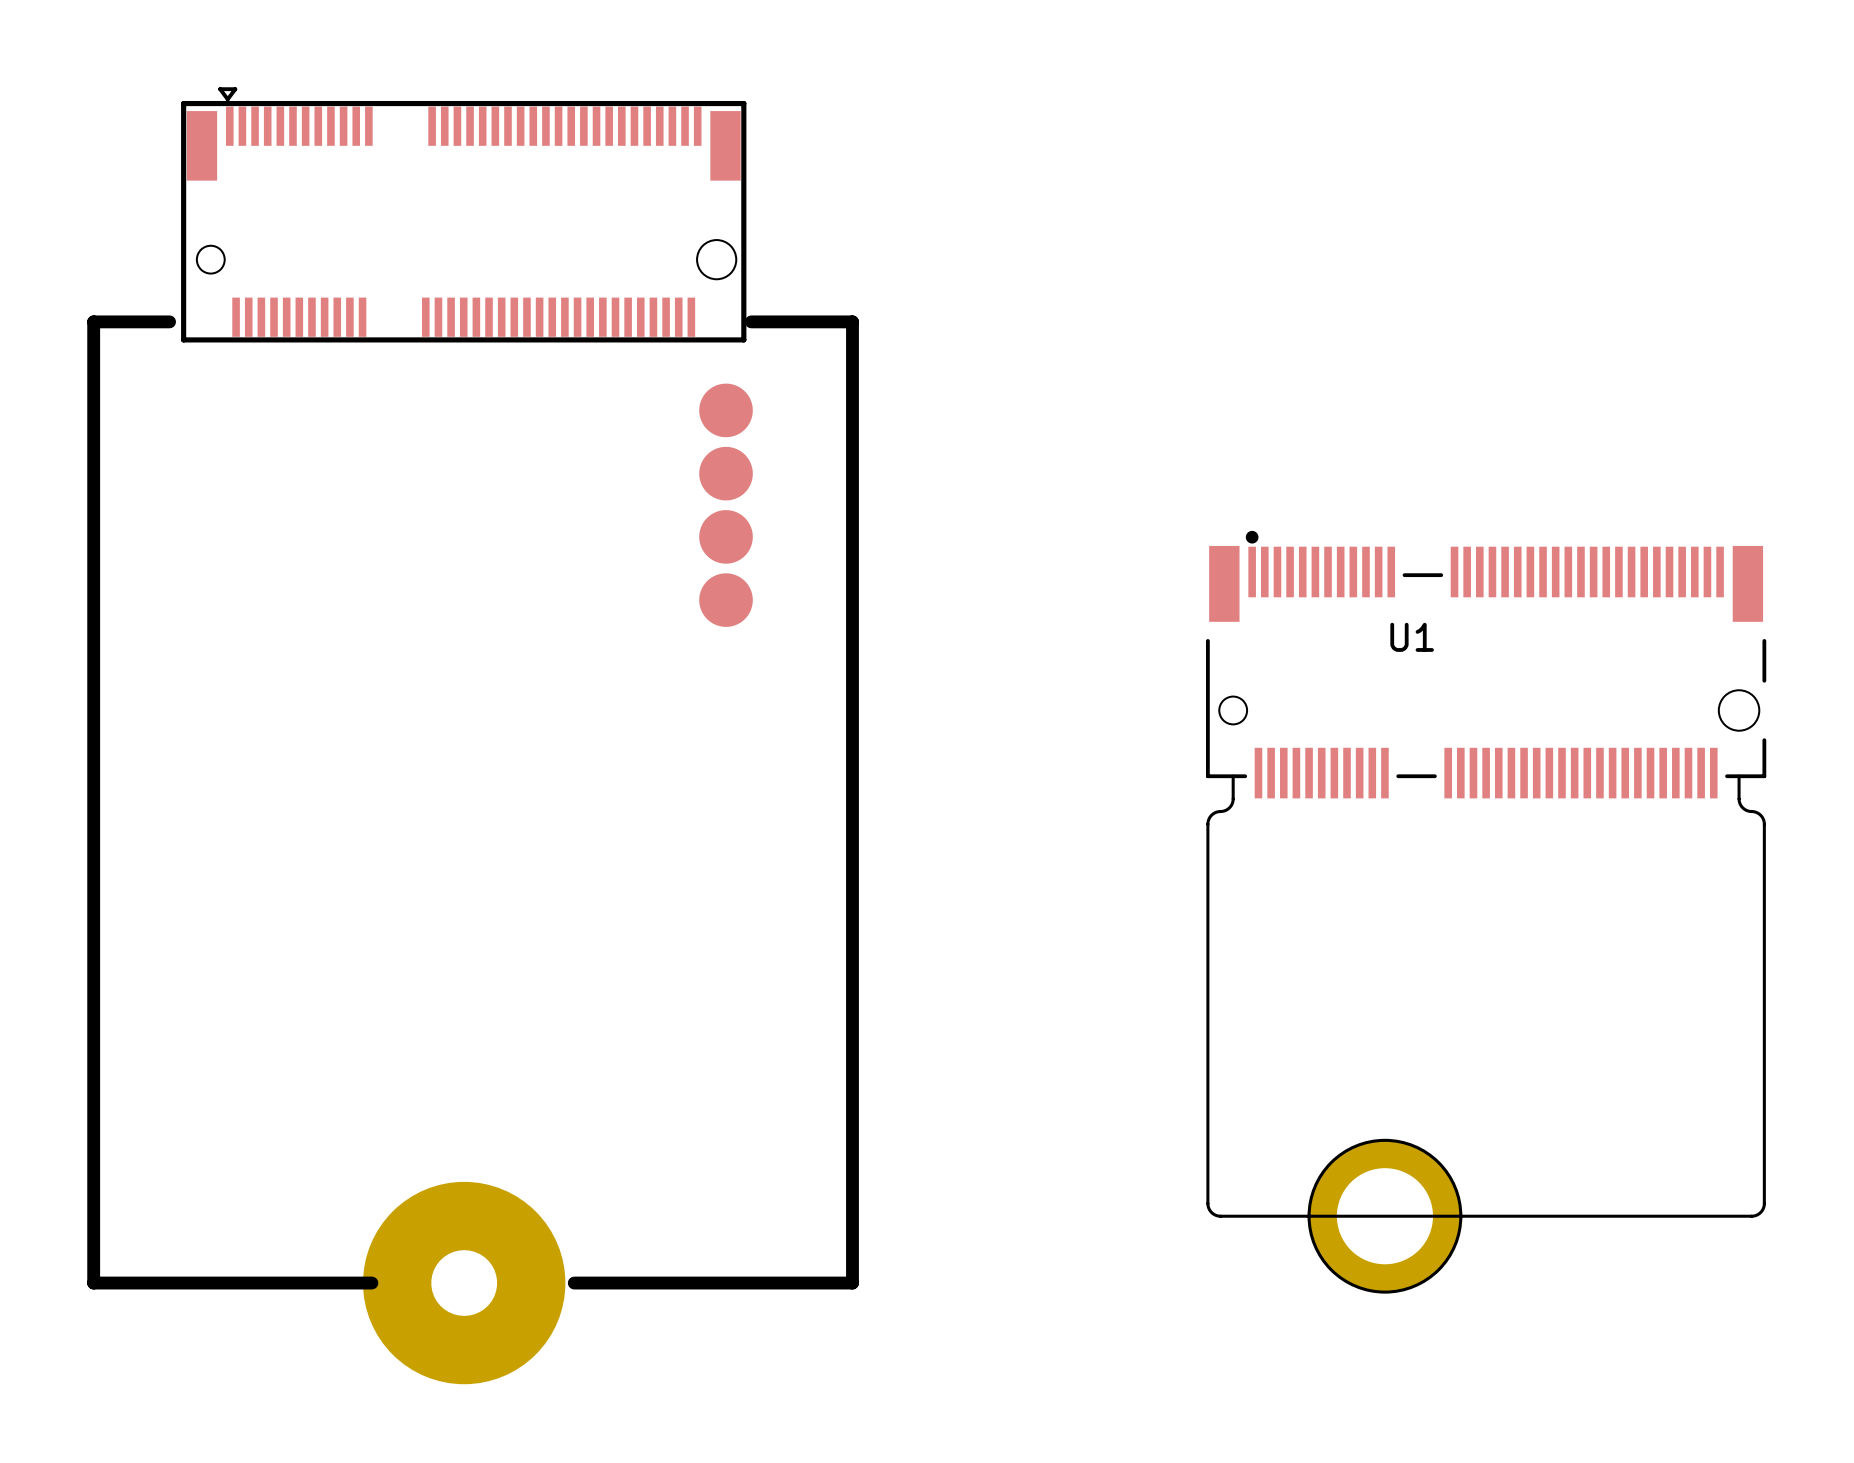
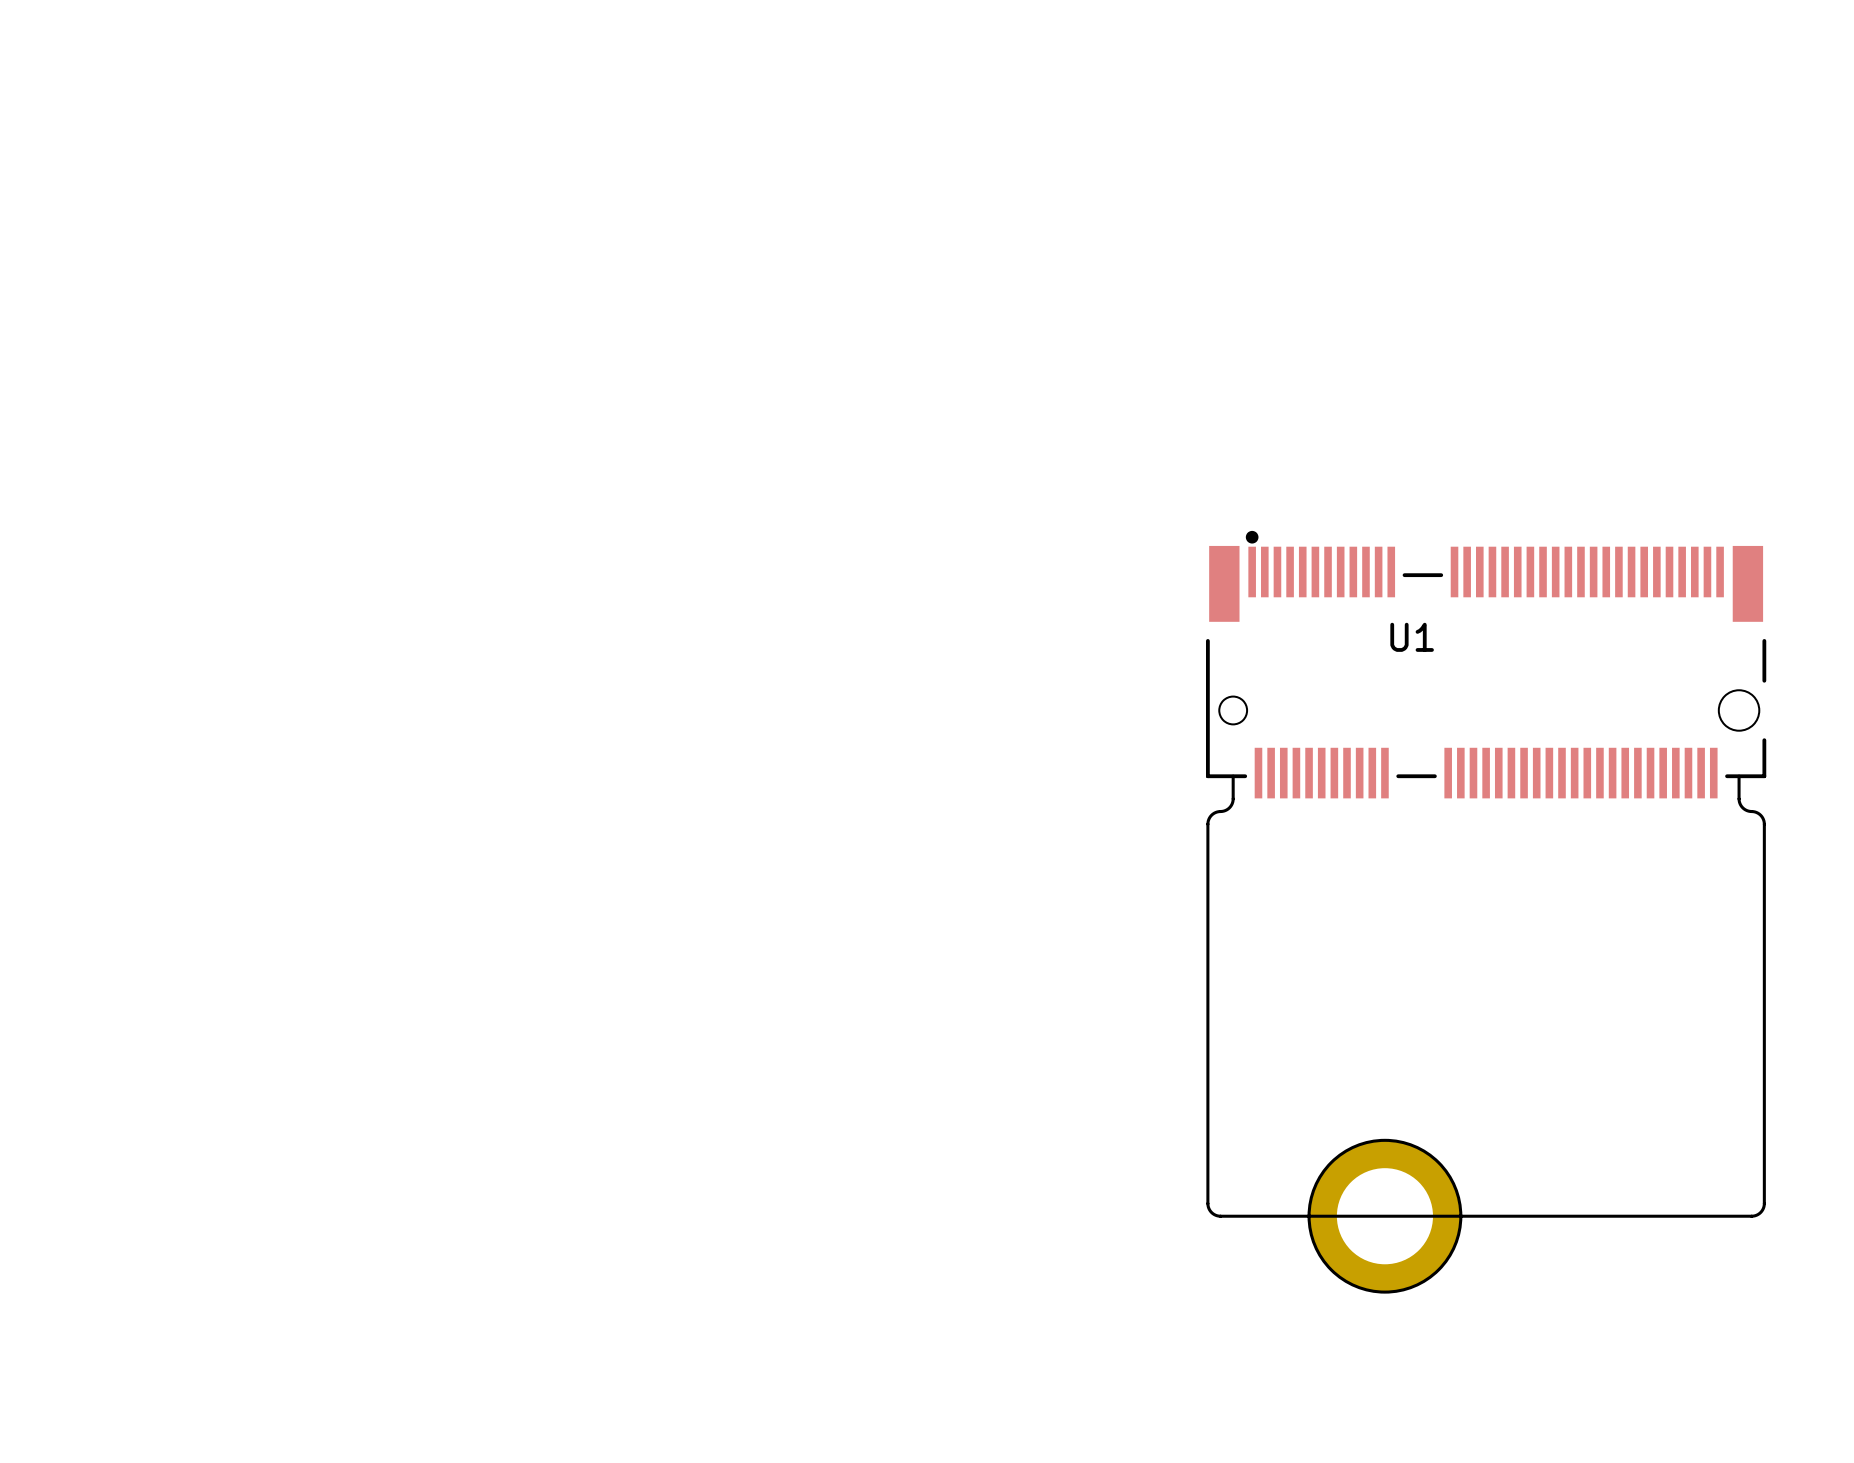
part: (473, 735) -> none

